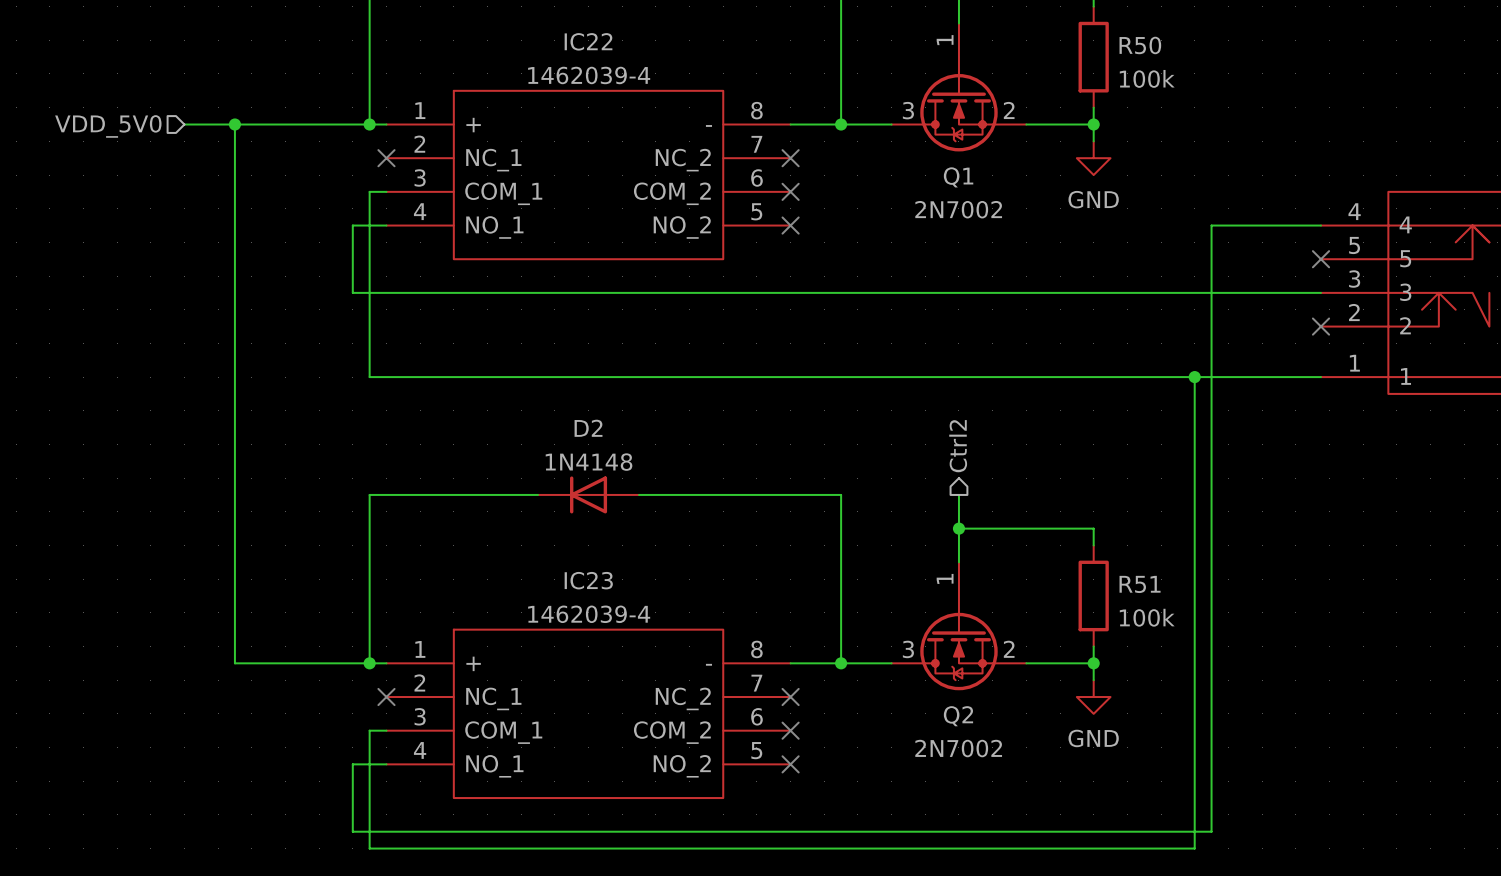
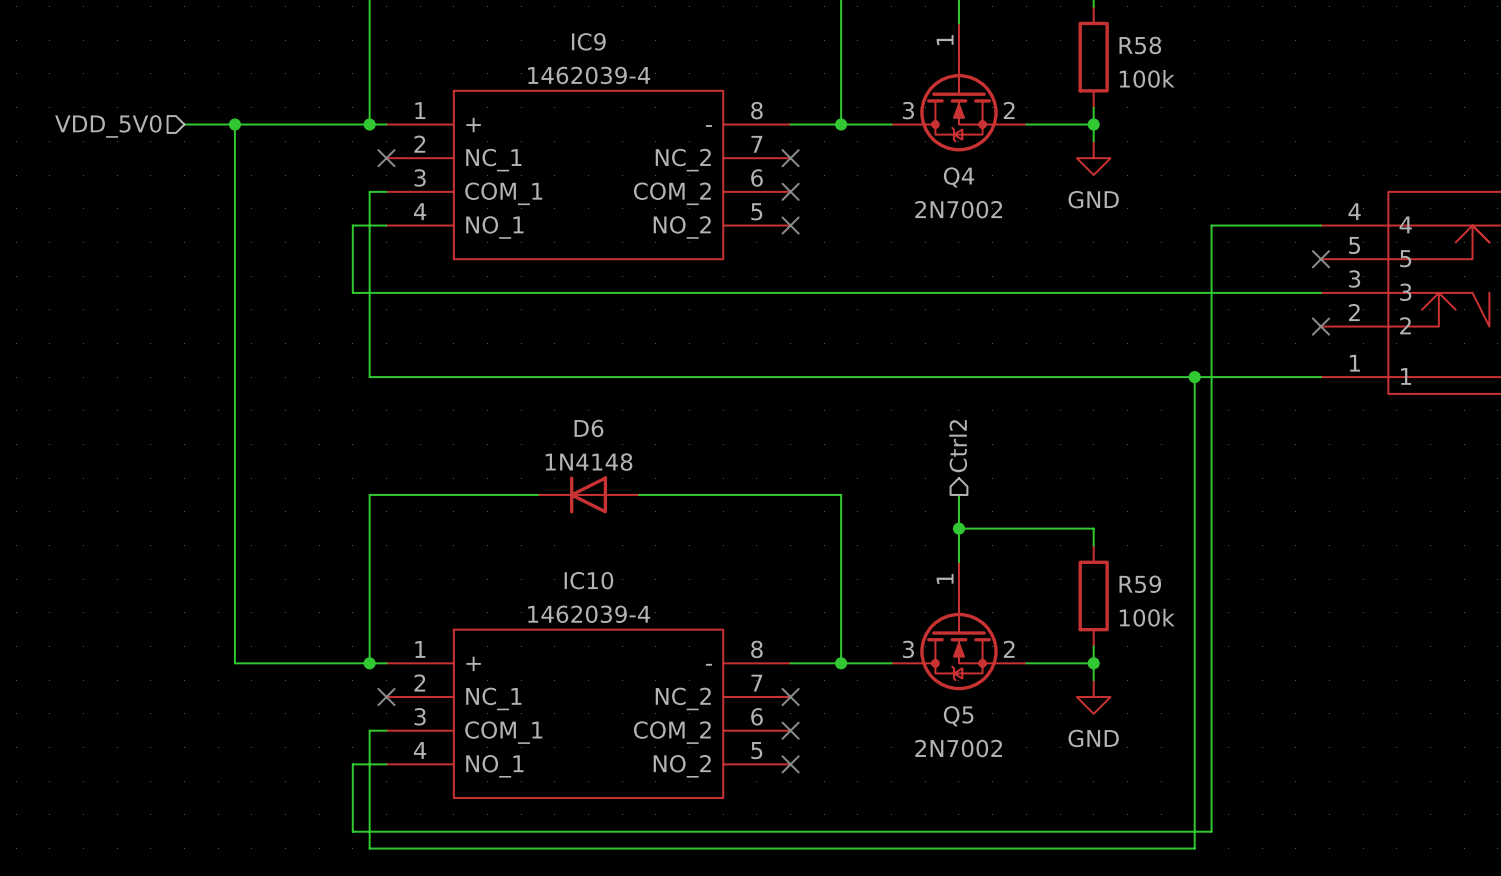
IC22 name: IC22 (588, 41) -> IC9 (588, 41)
R50 name: R50 (1140, 45) -> R58 (1140, 45)
Q1 name: Q1 (958, 177) -> Q4 (958, 177)
D2 name: D2 (588, 428) -> D6 (588, 428)
IC23 name: IC23 (588, 580) -> IC10 (588, 580)
R51 name: R51 (1140, 584) -> R59 (1140, 584)
Q2 name: Q2 (958, 716) -> Q5 (958, 716)

